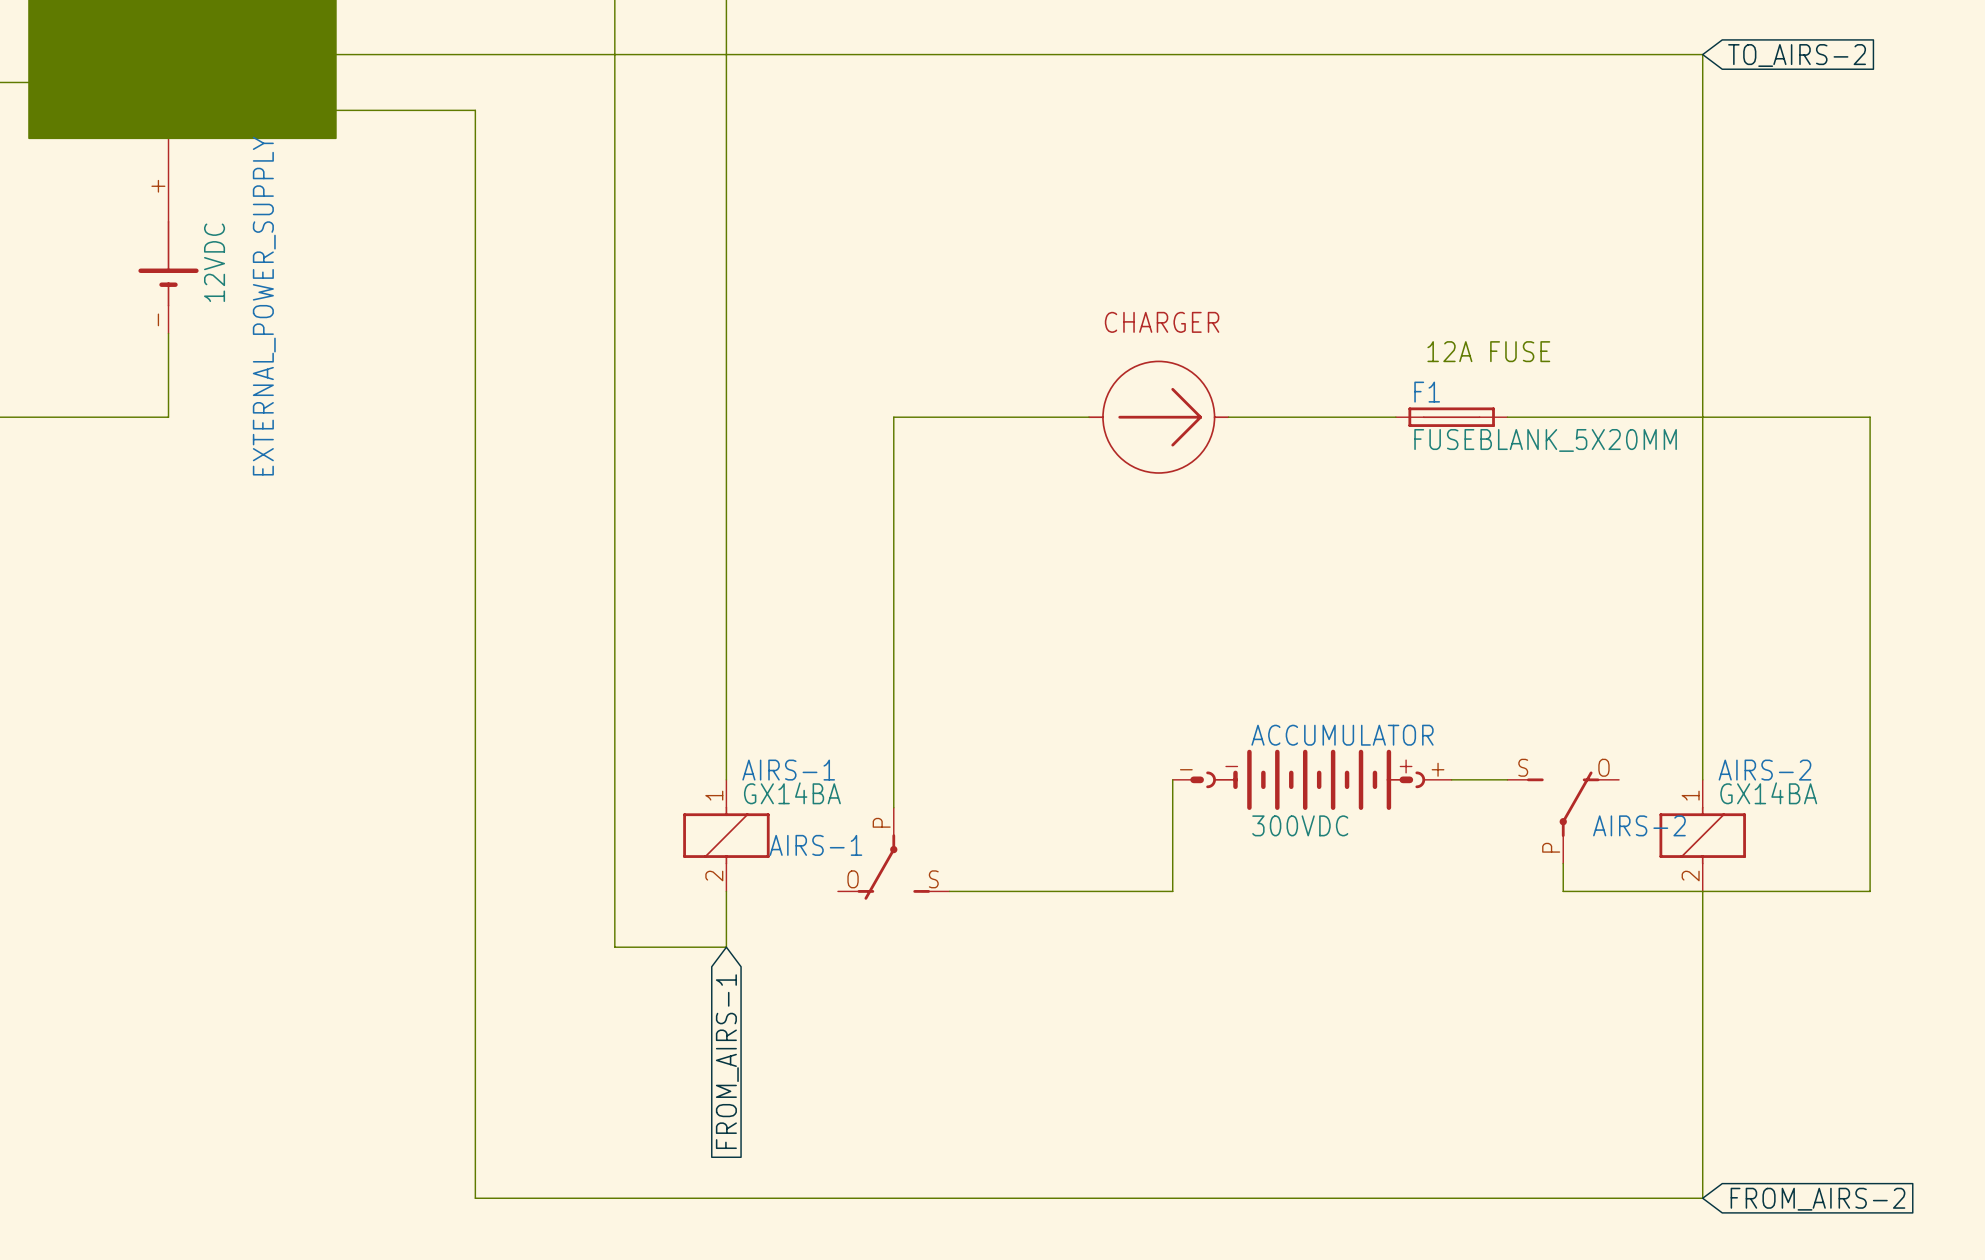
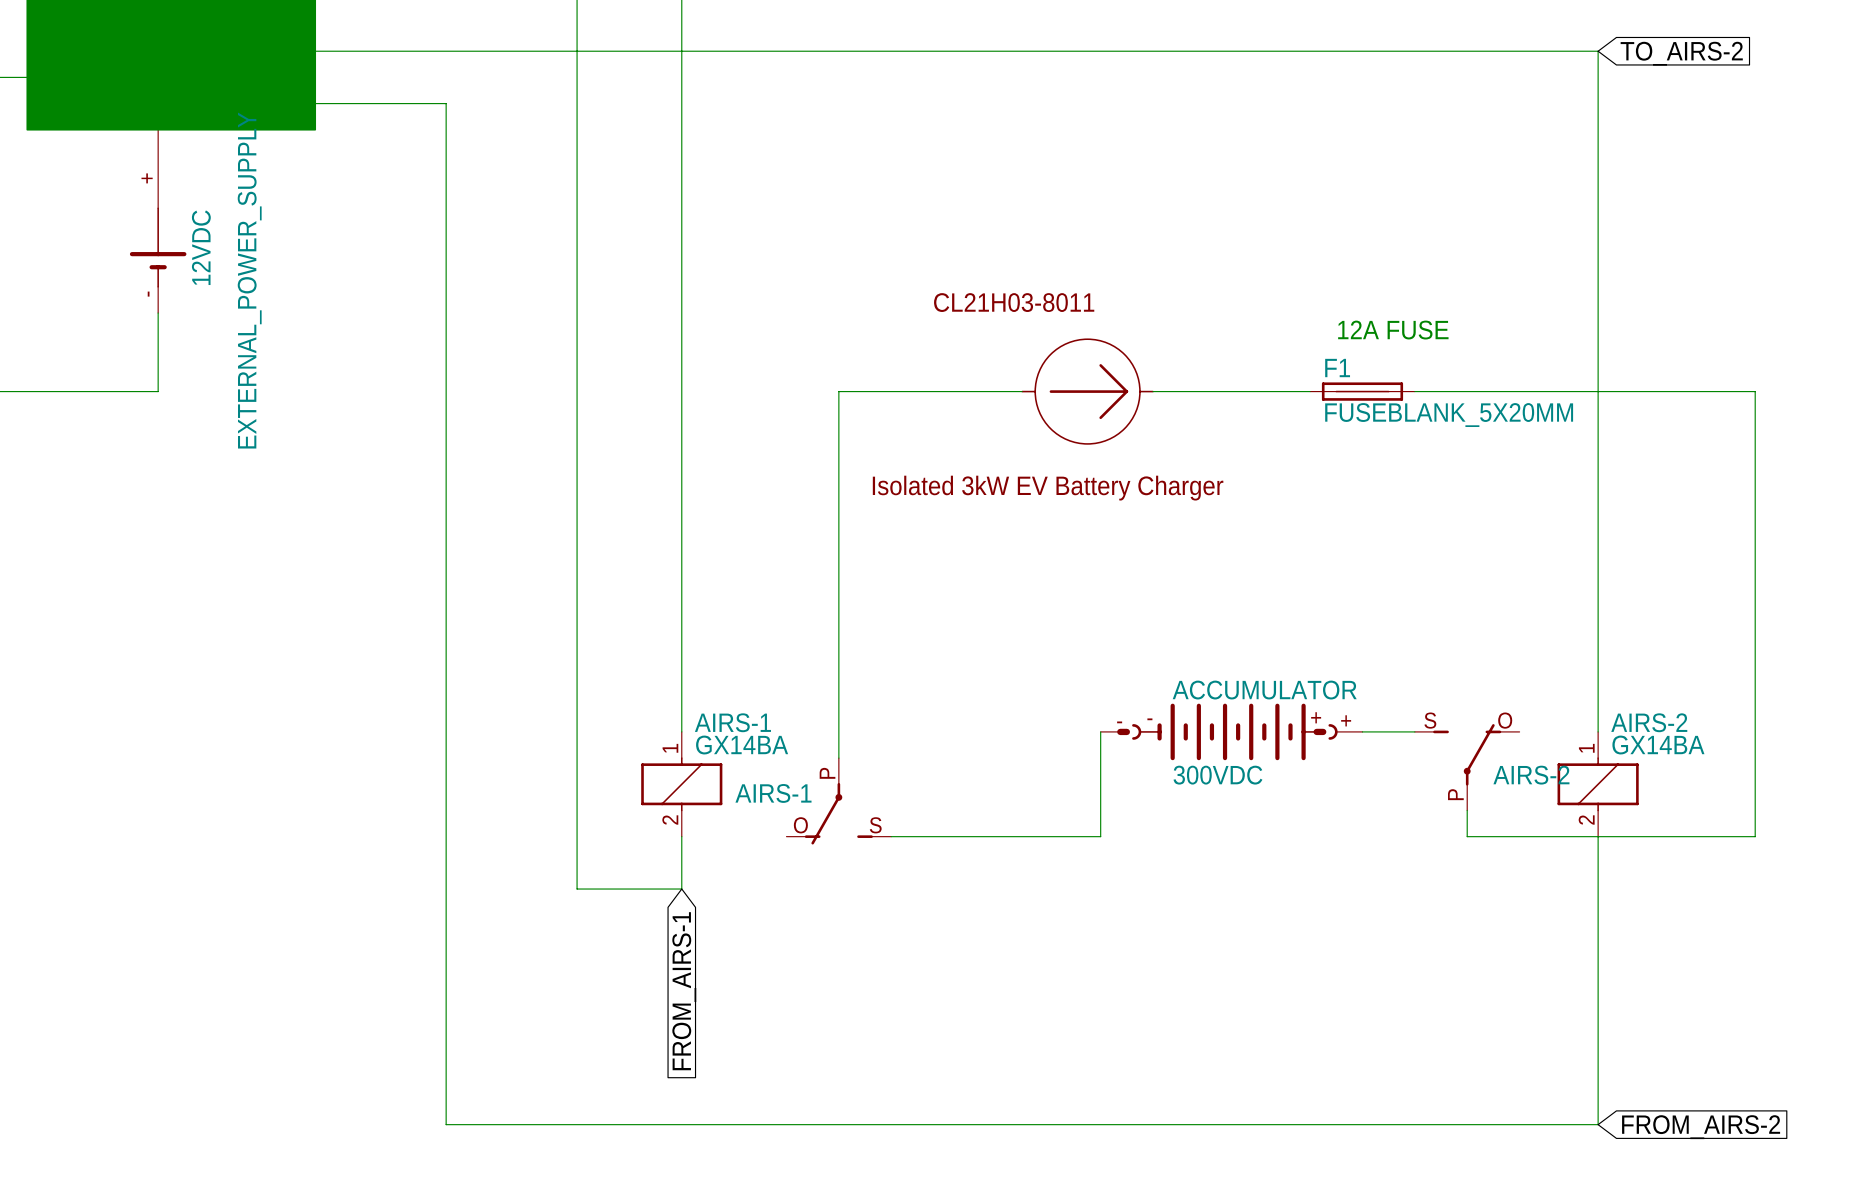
CHARGER name: CHARGER (1162, 322) -> CL21H03-8011 (1014, 302)
CHARGER value: none -> Isolated 3kW EV Battery Charger (1048, 488)

